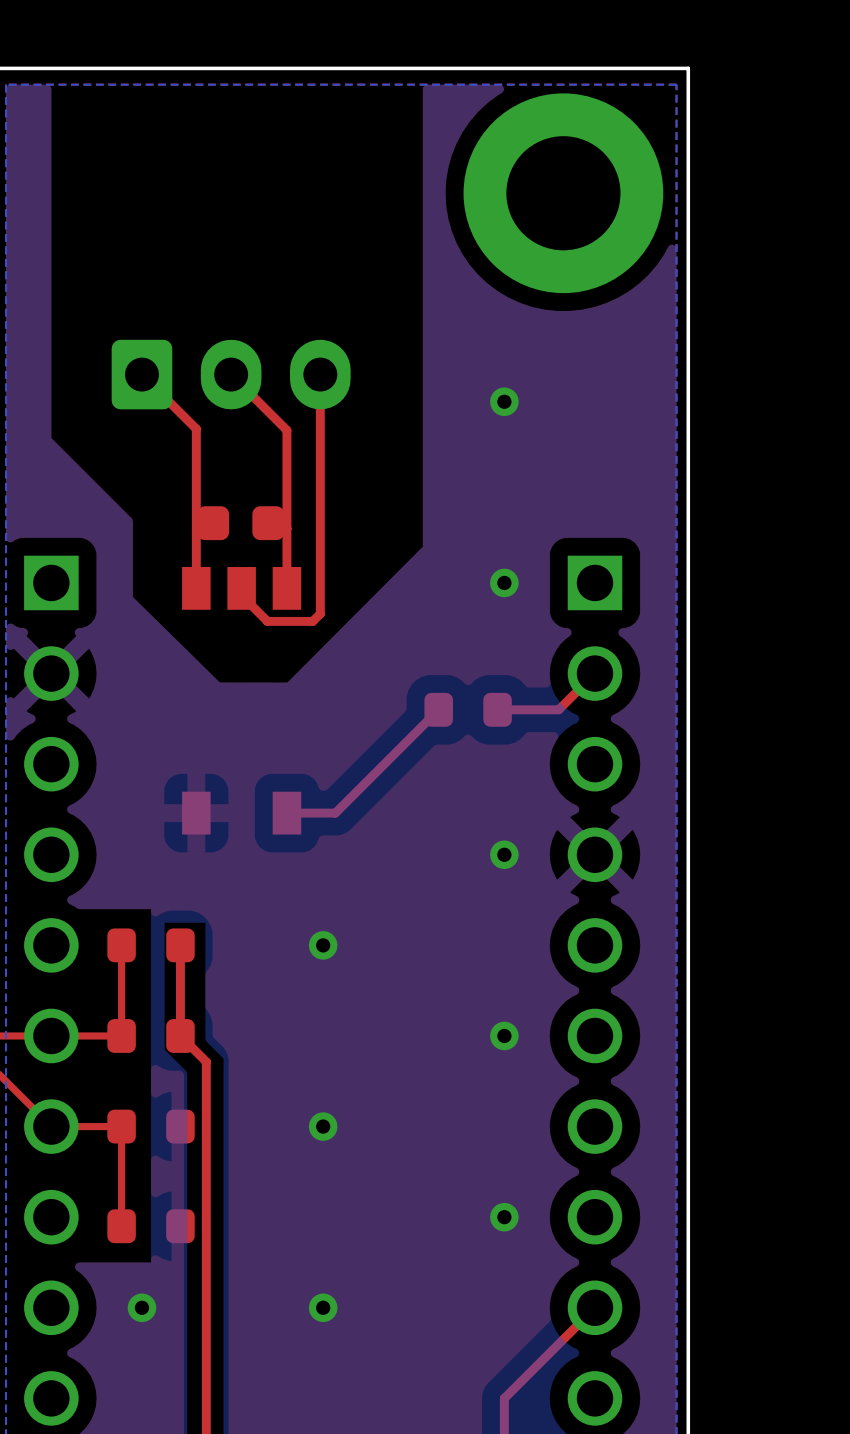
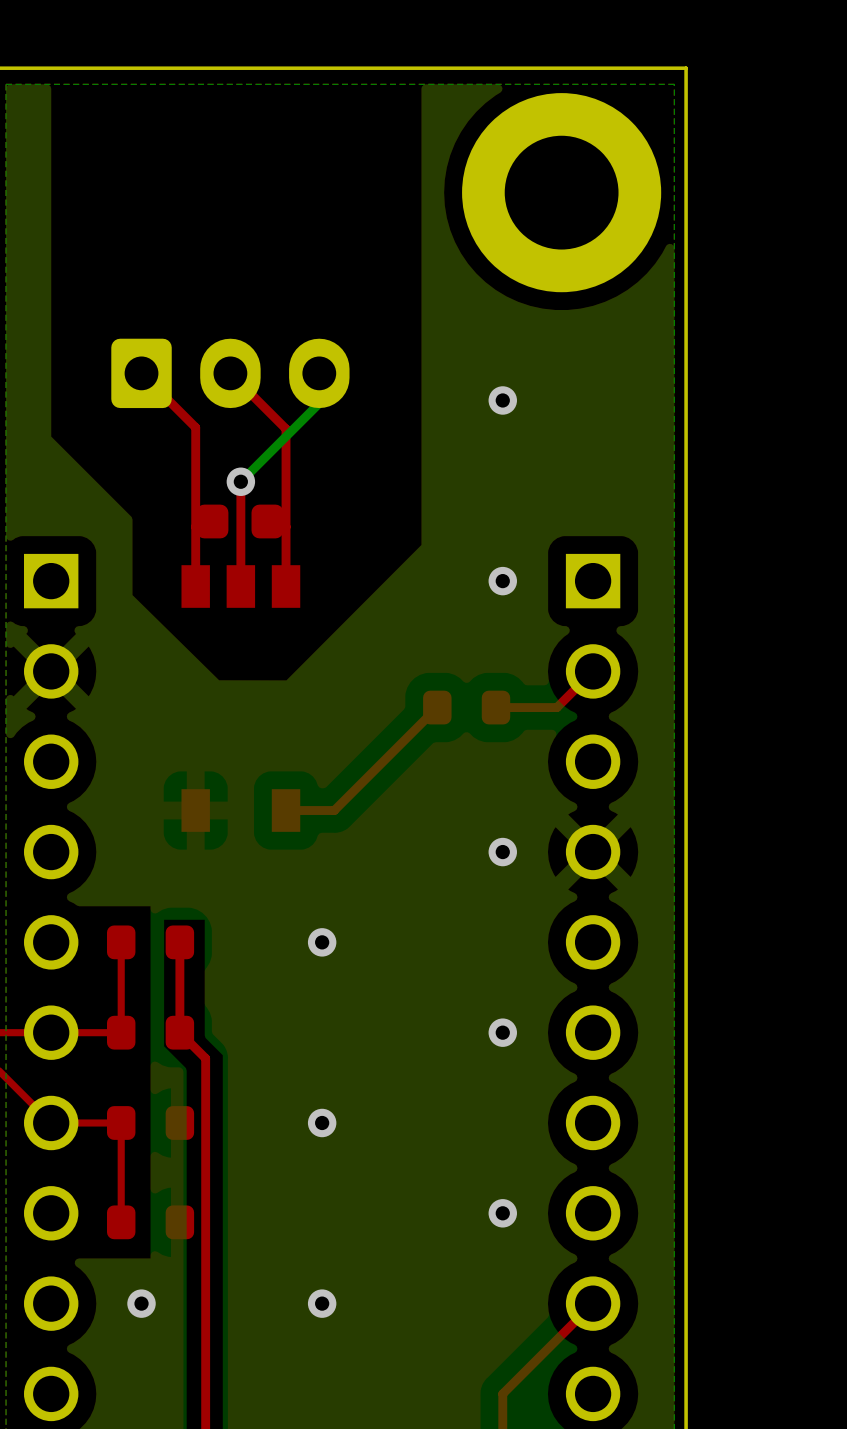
top track: (320, 374) (320, 613) (312, 621) (267, 621) (241, 595) (241, 588) -> (240, 481) (240, 586)
bottom track: none -> (319, 403) (240, 481)
via: none -> (240, 481)

